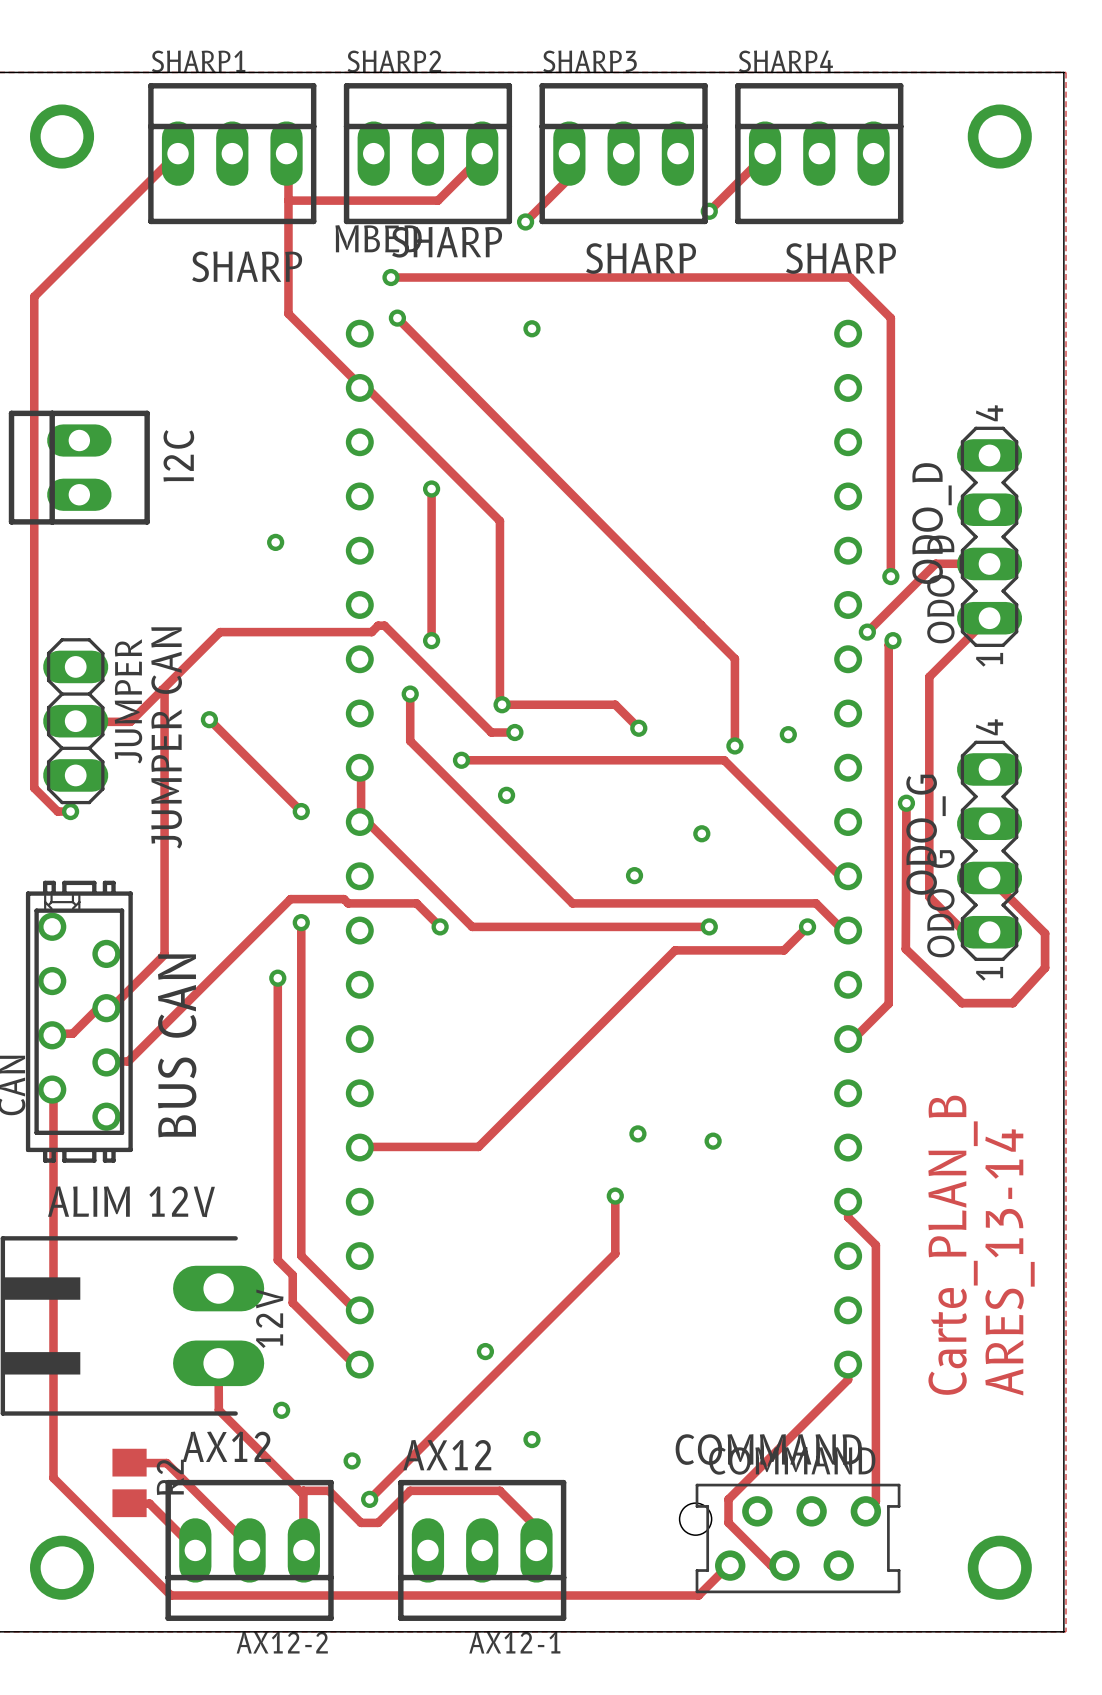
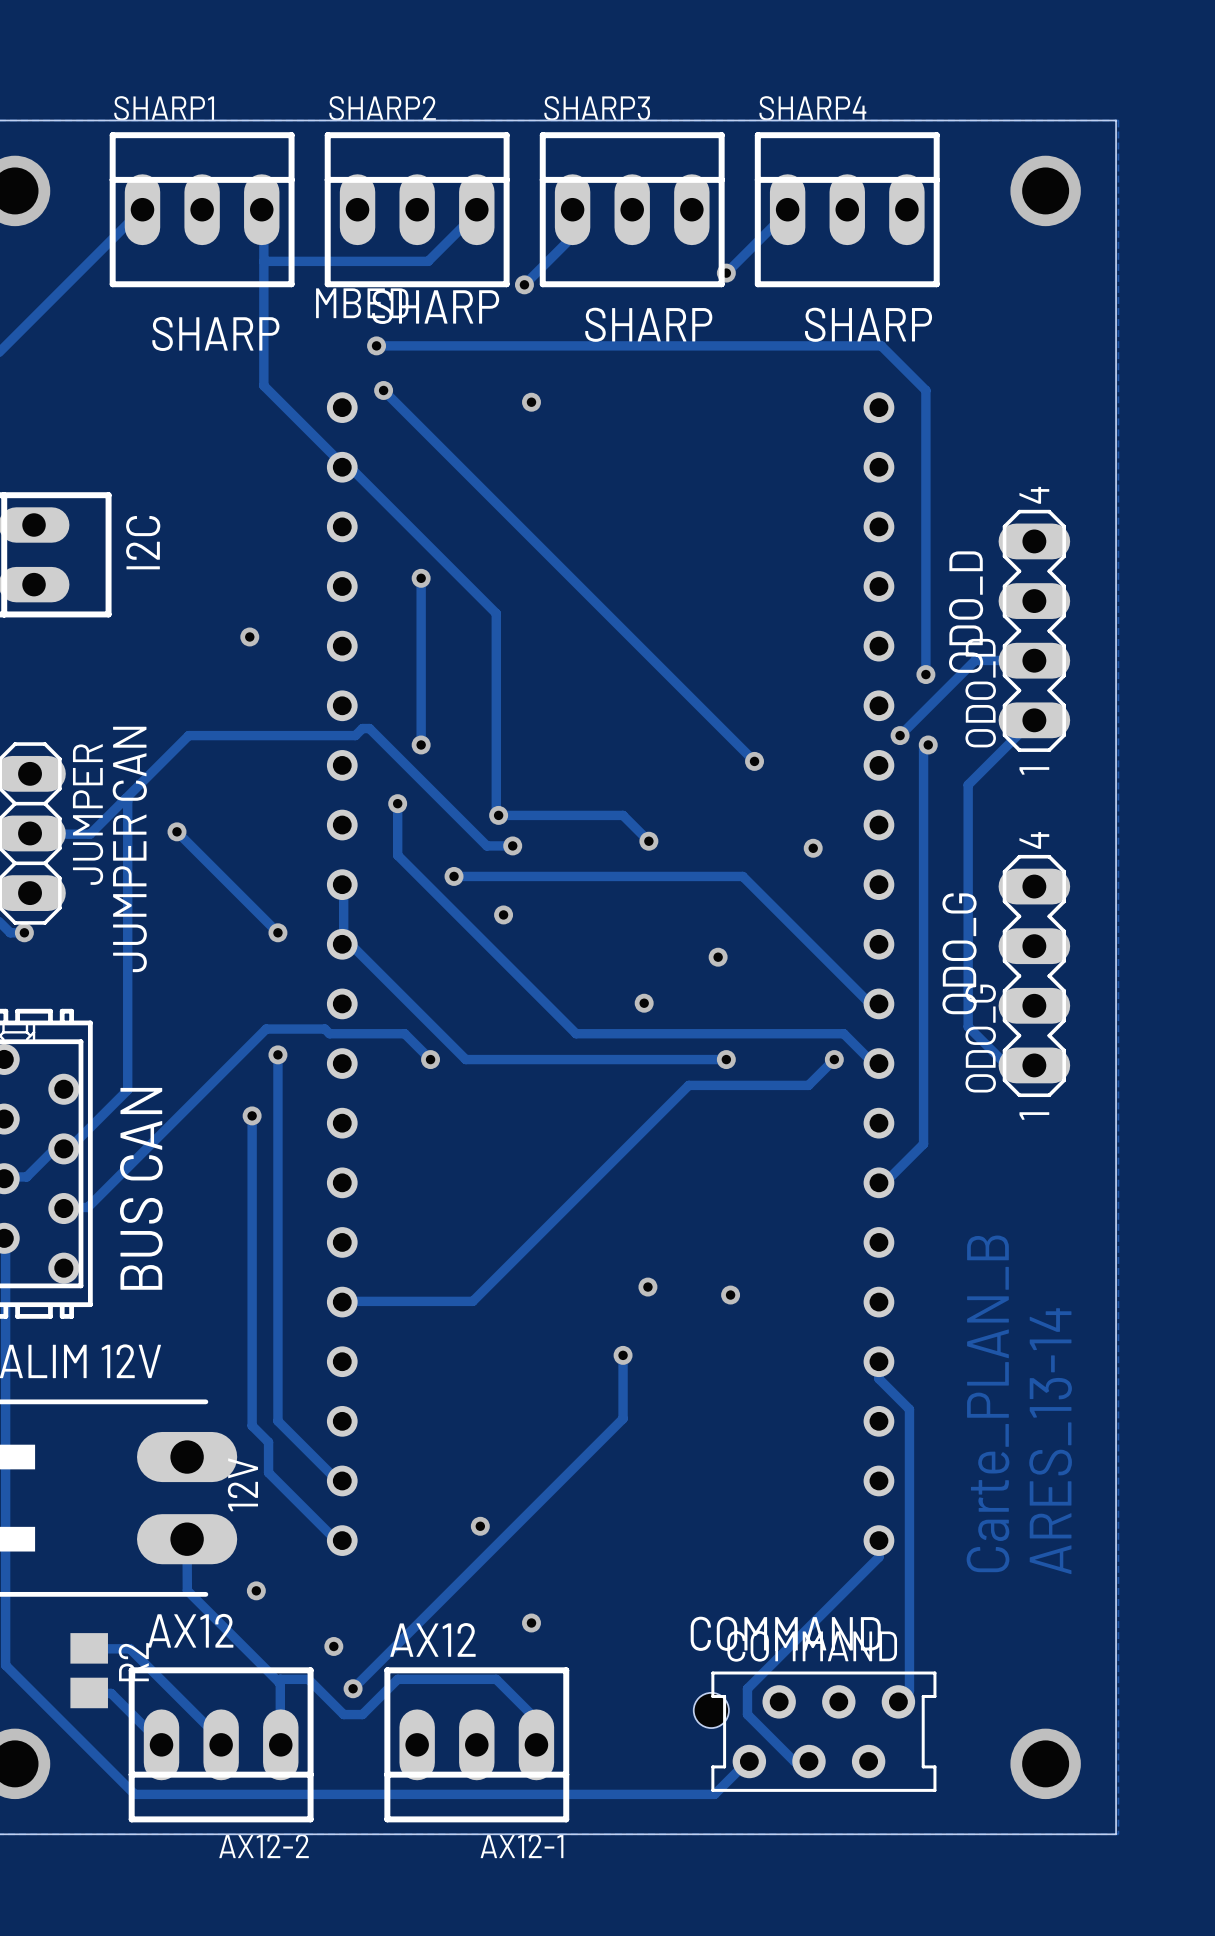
track: (397, 318) (734, 658) (734, 745) -> (383, 390) (754, 761)
via position: (734, 745) -> (754, 761)
track: (906, 803) (905, 949) (961, 1003) (1012, 1003) (1045, 967) (1045, 933) (989, 877) -> none
via: (906, 803) -> none

